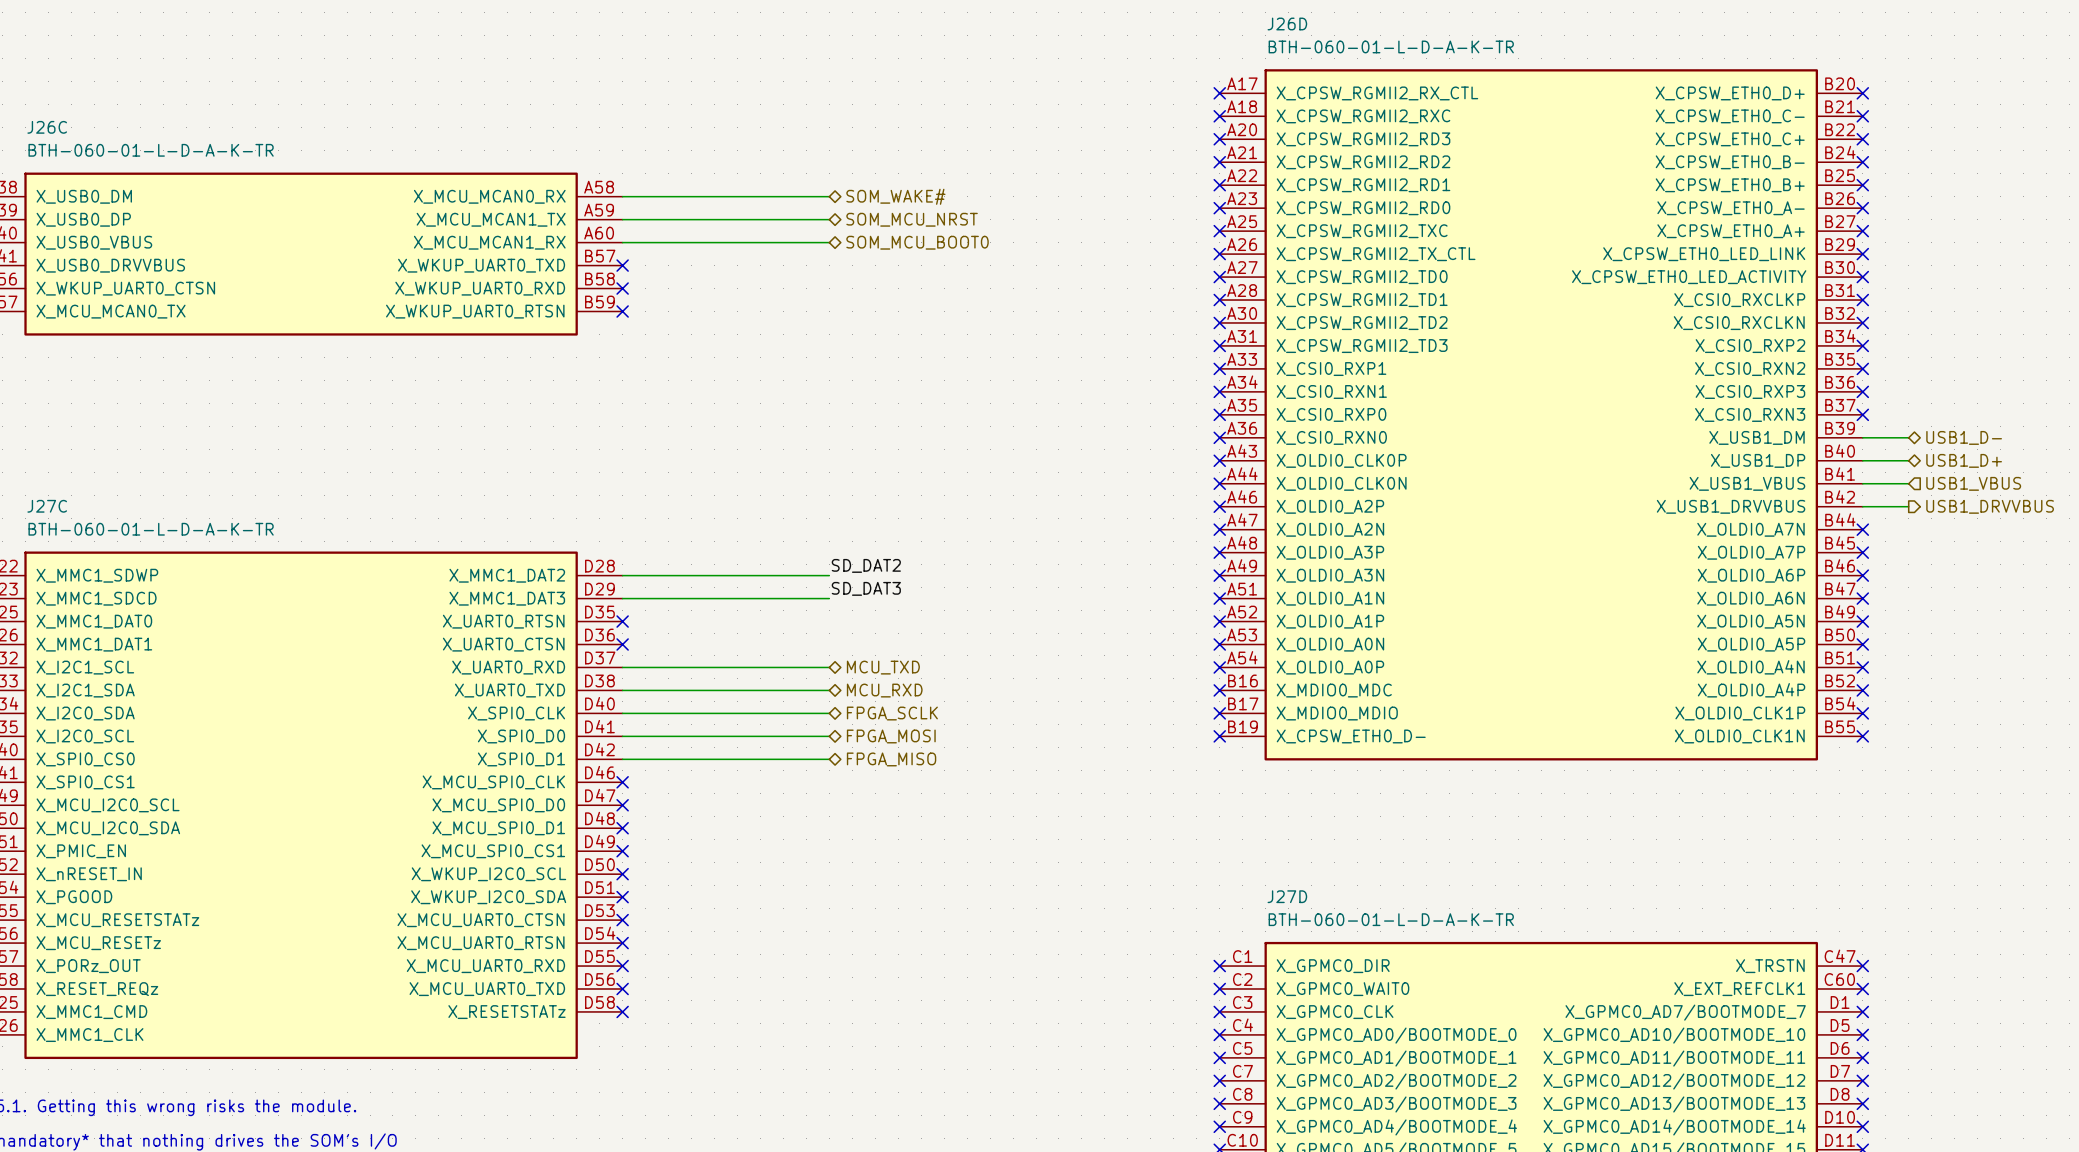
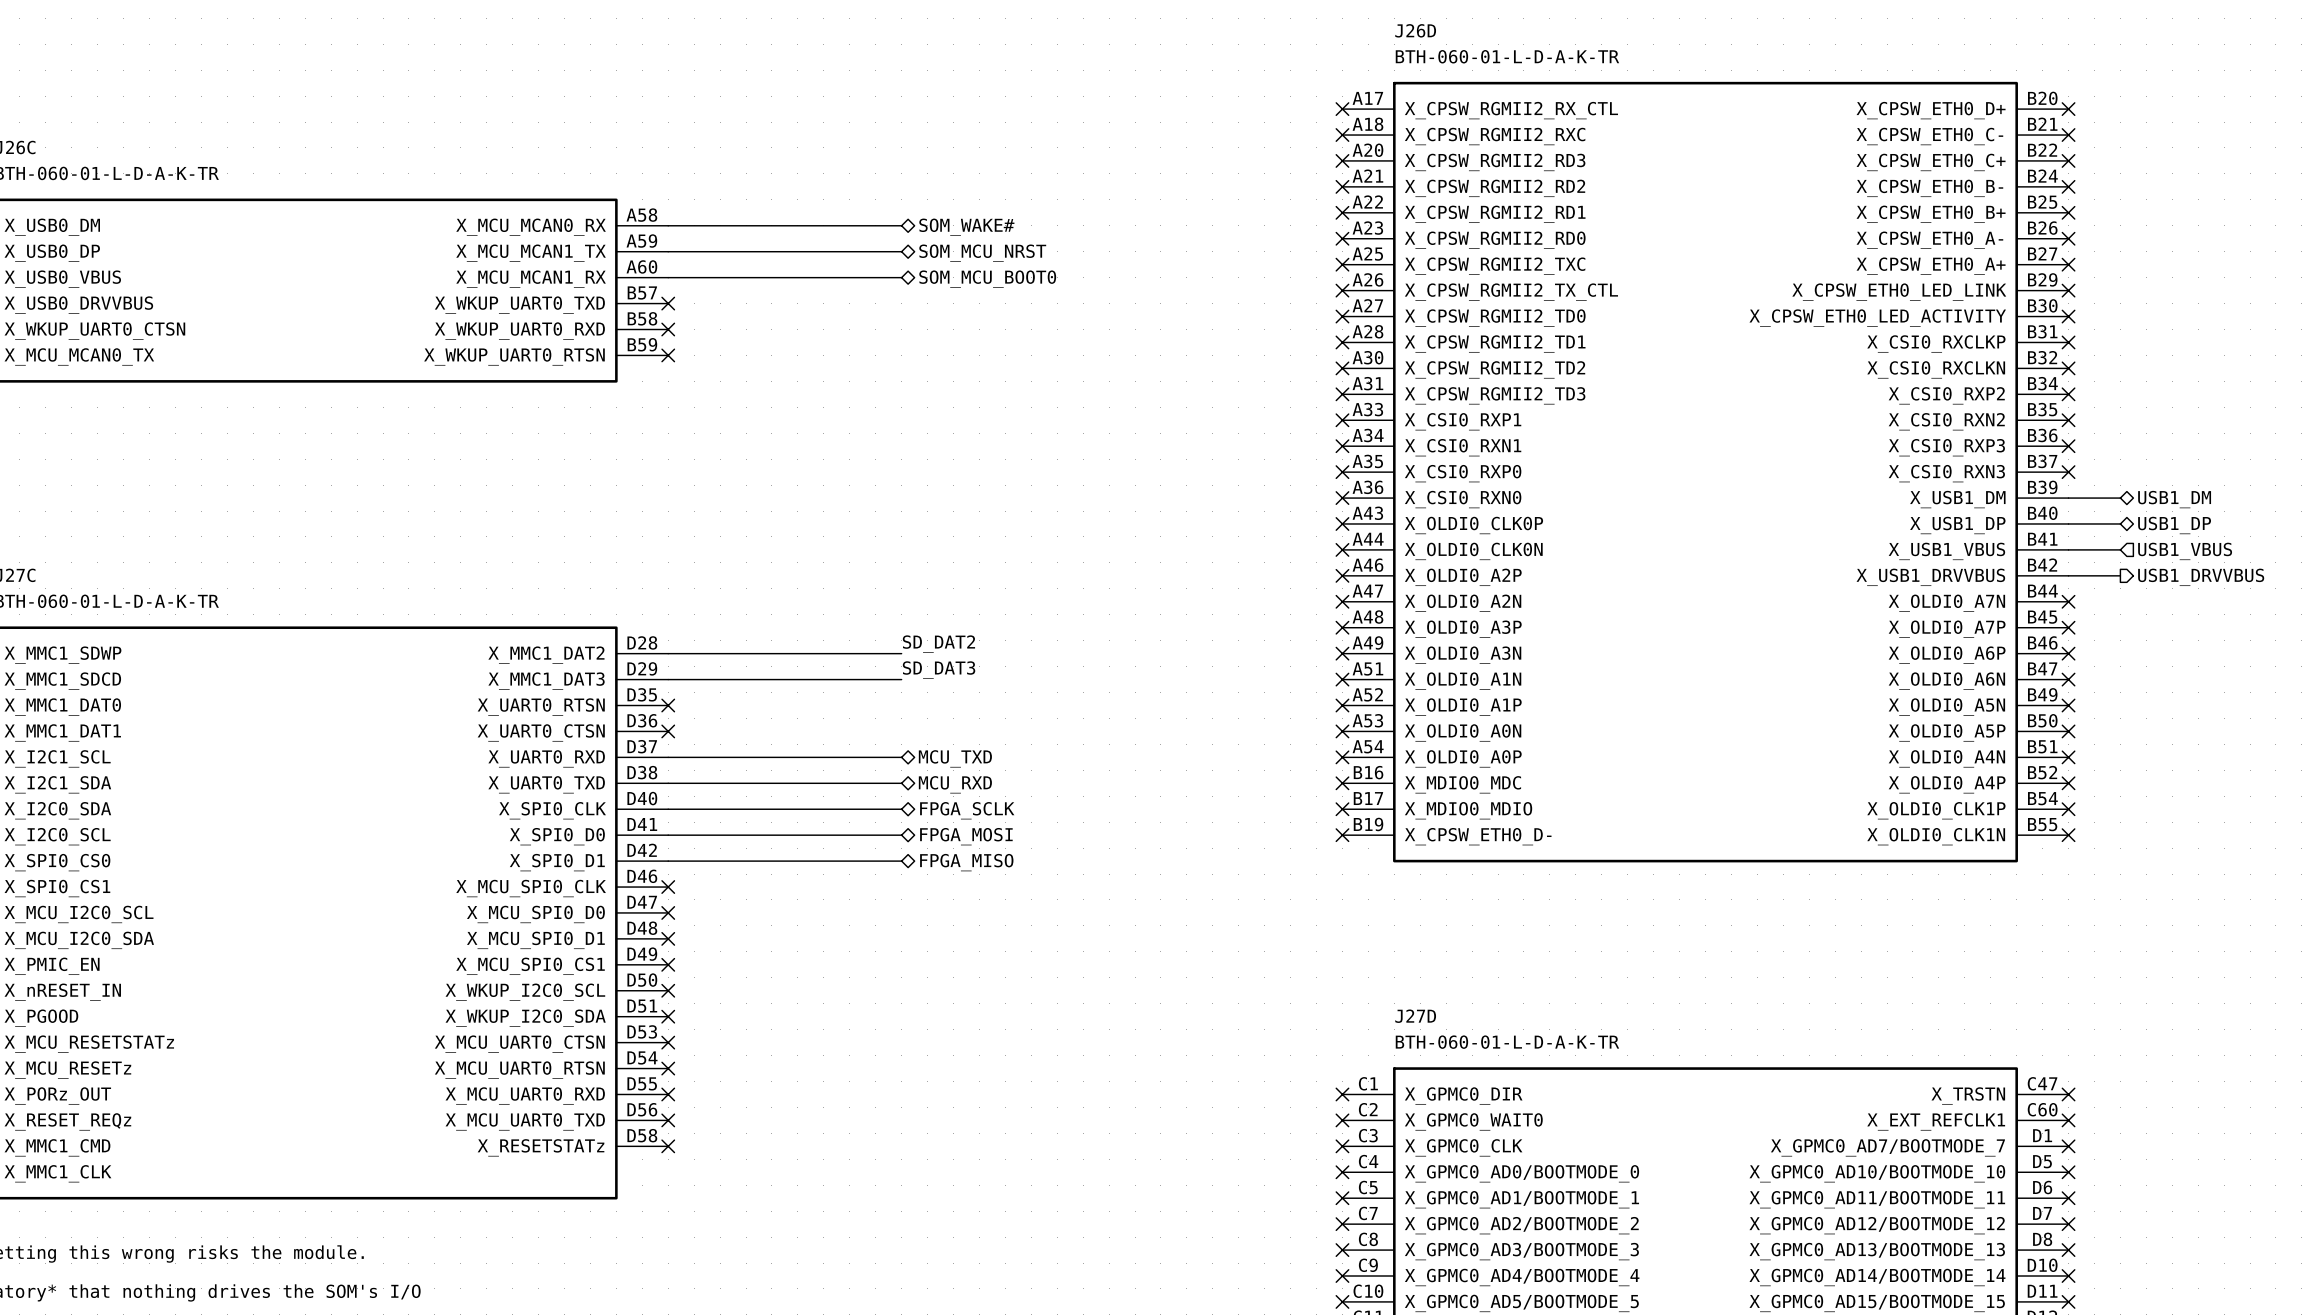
hierarchical label: USB1_D- (1964, 437) -> USB1_DM (2174, 499)
hierarchical label: USB1_D+ (1964, 460) -> USB1_DP (2174, 525)

